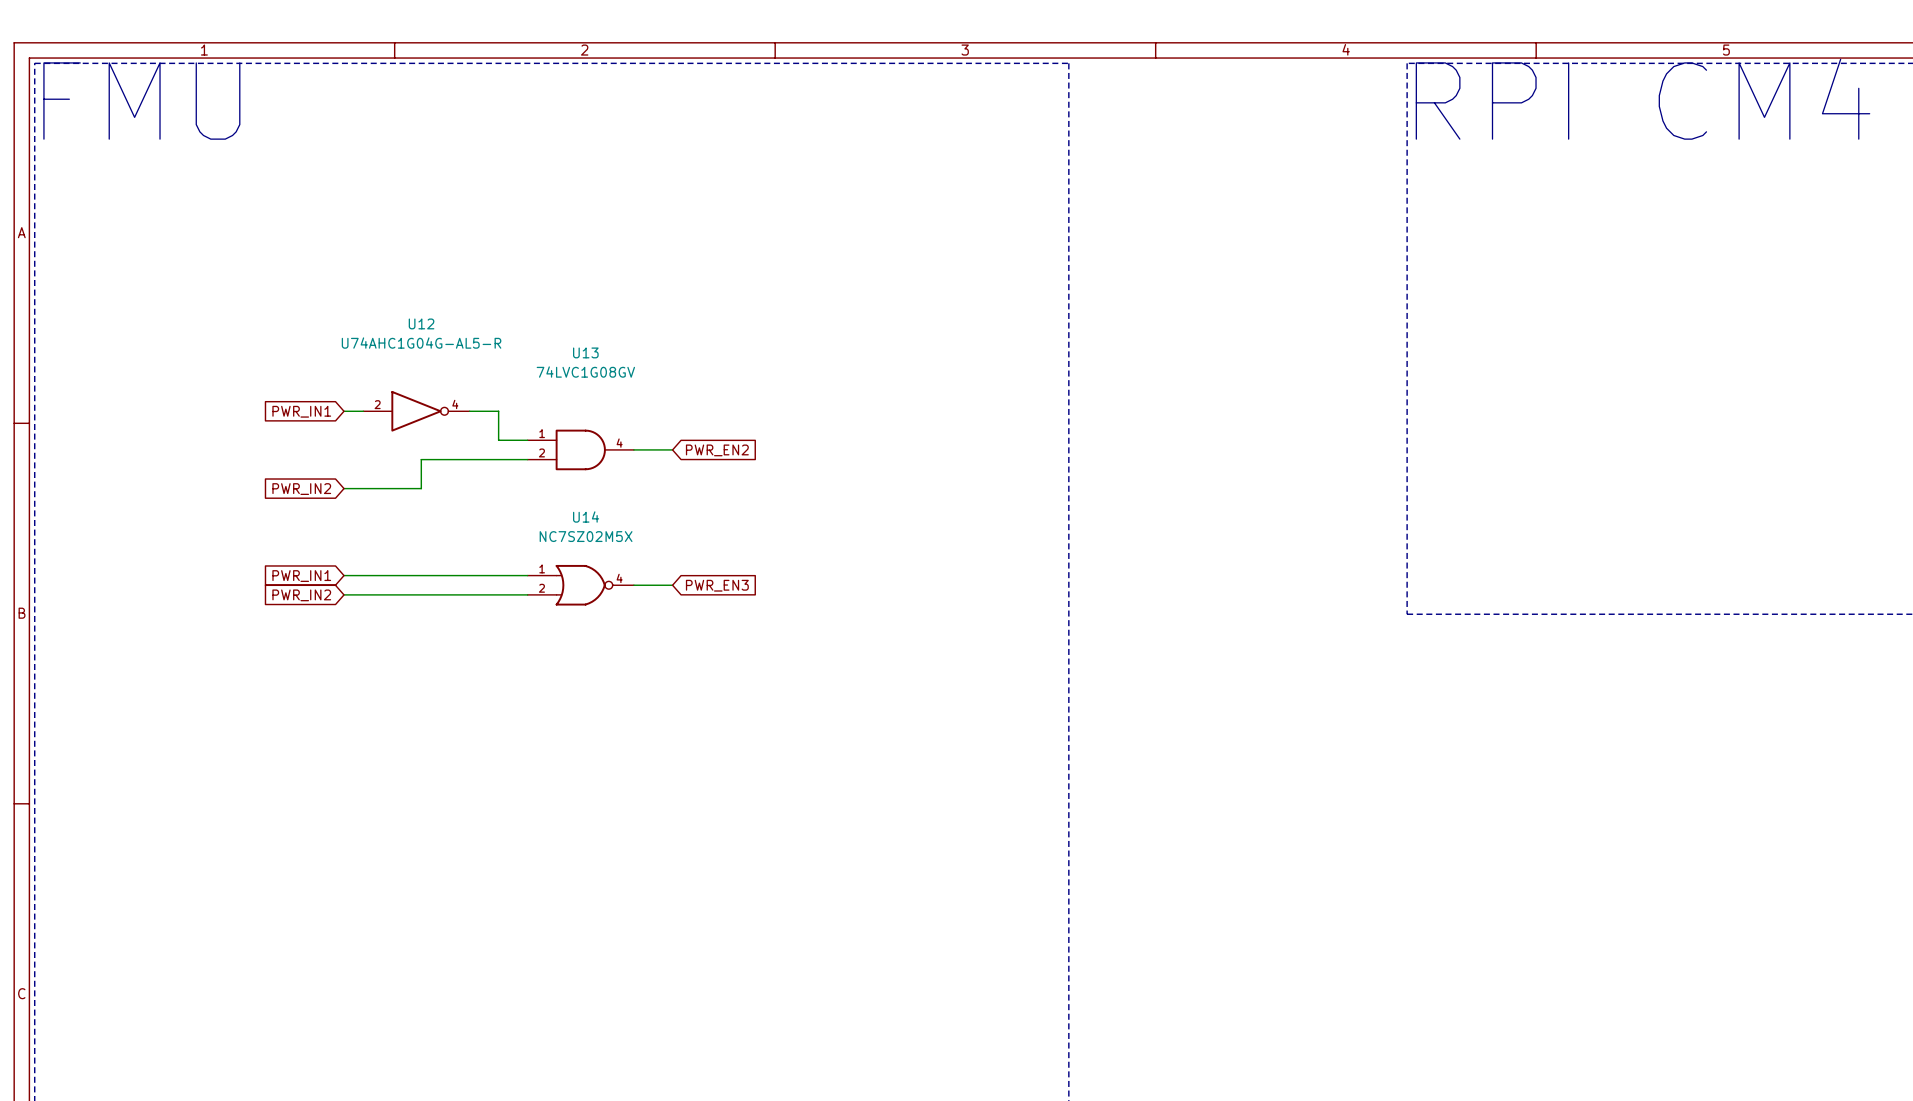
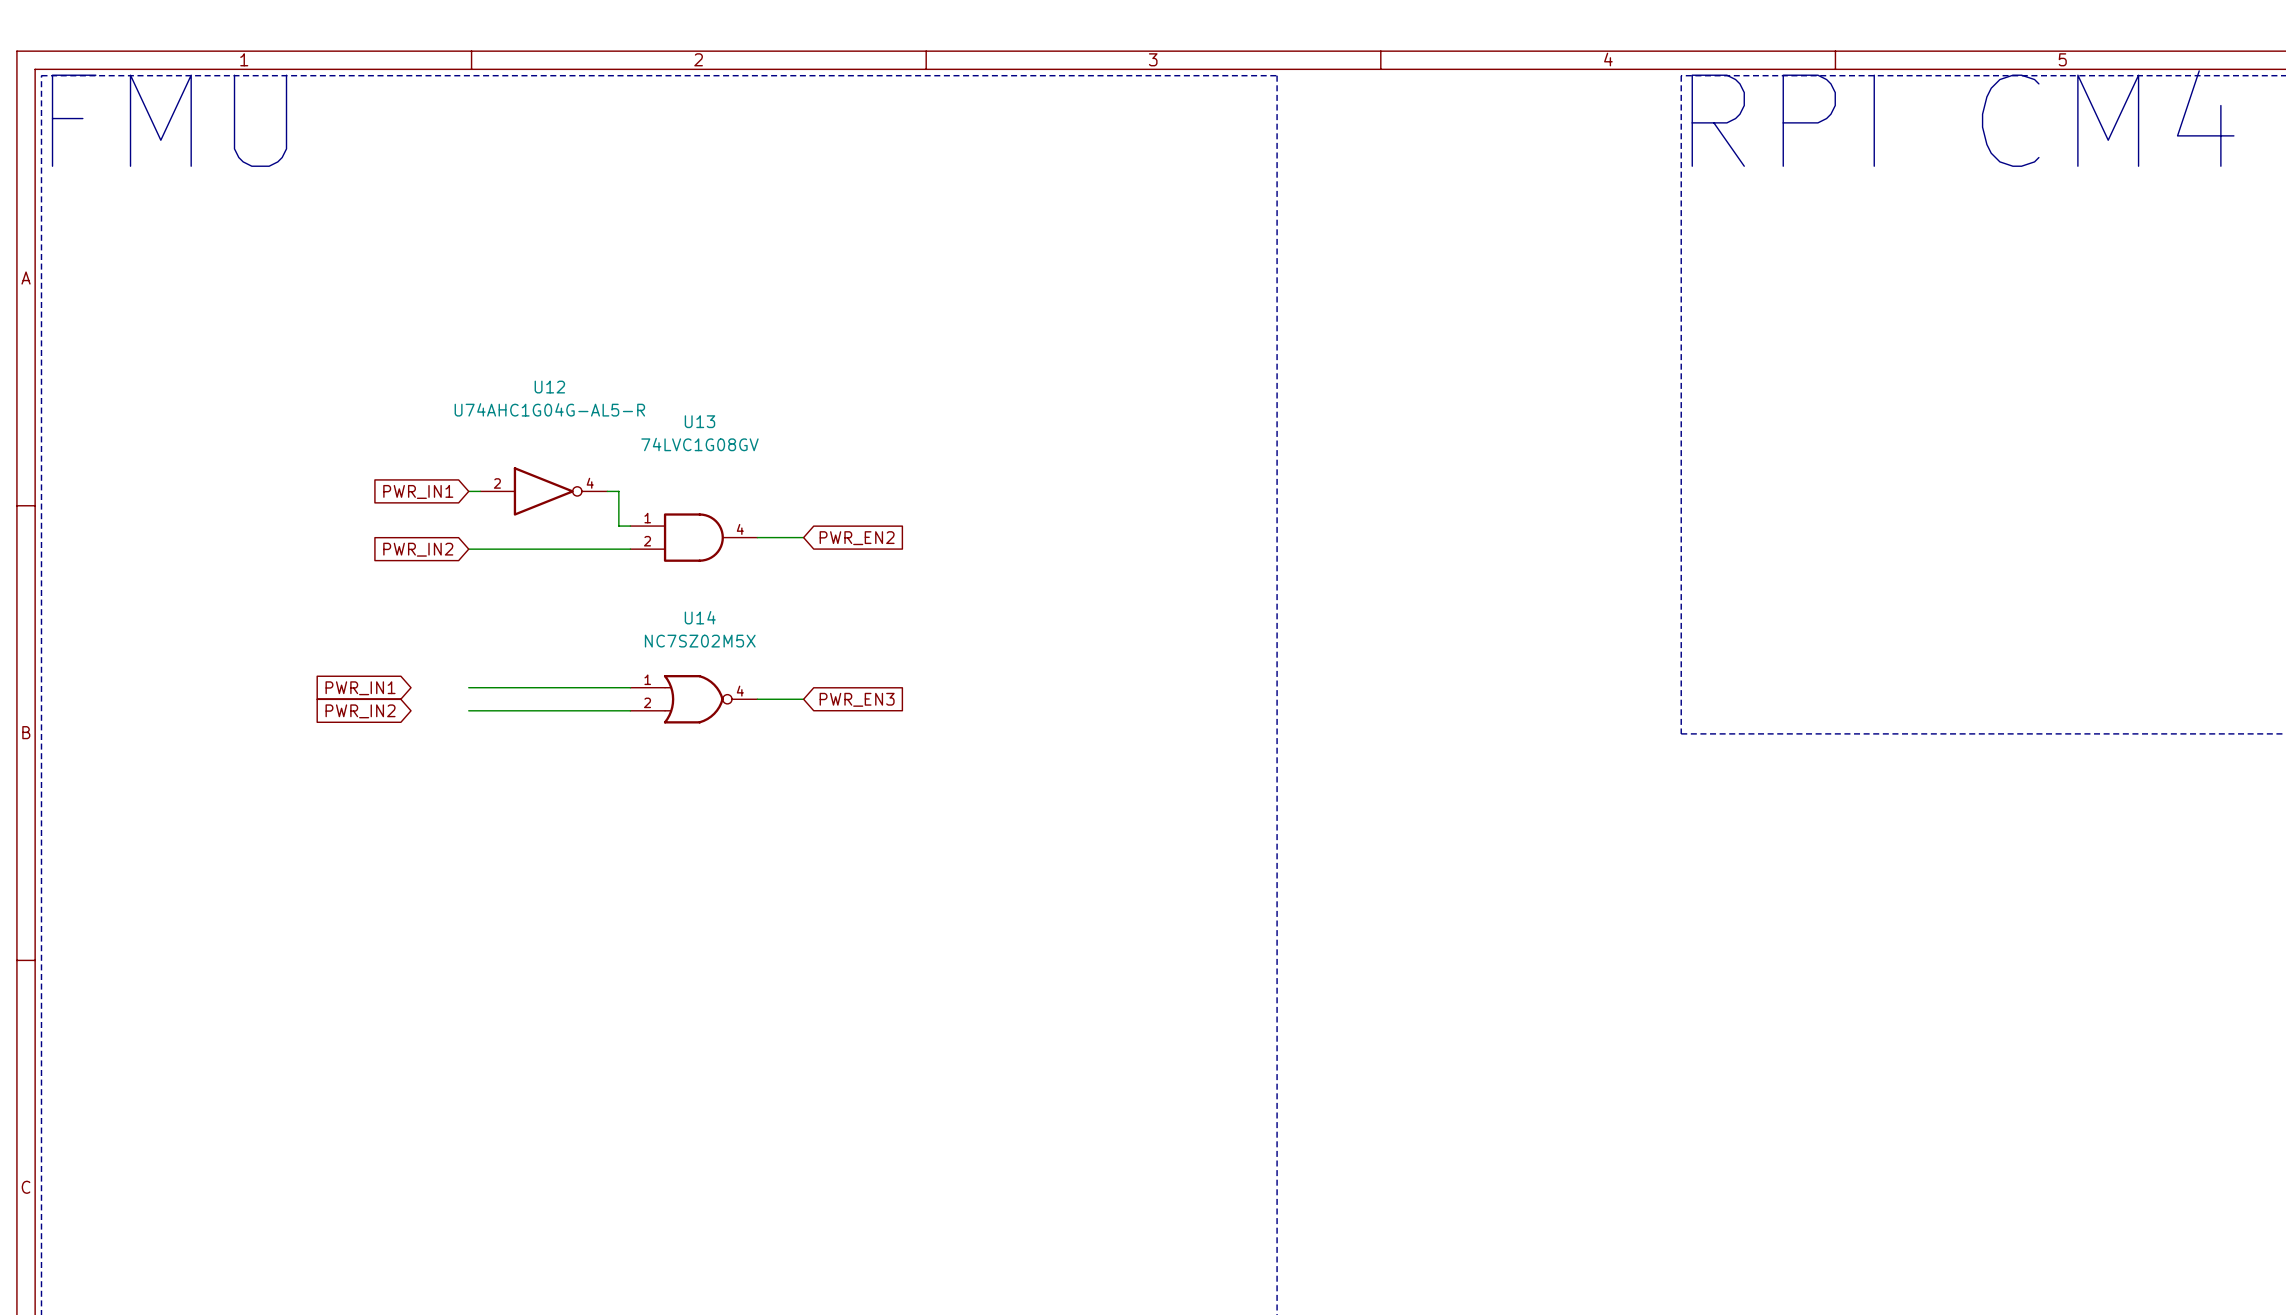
global label position: PWR_IN1 (301, 411) -> PWR_IN1 (418, 491)
wire: (343, 411) (363, 411) -> none
wire: none -> (468, 491) (480, 491)
U12 position: (416, 411) -> (543, 491)
wire: (469, 411) (498, 411) (498, 440) (517, 440) -> (607, 491) (618, 491) (618, 526)
wire: (421, 459) (421, 488) (343, 488) -> (503, 549) (468, 549)
global label position: PWR_IN2 (301, 489) -> PWR_IN2 (418, 549)
wire: (343, 575) (392, 575) -> none
wire: (343, 594) (392, 594) -> none

